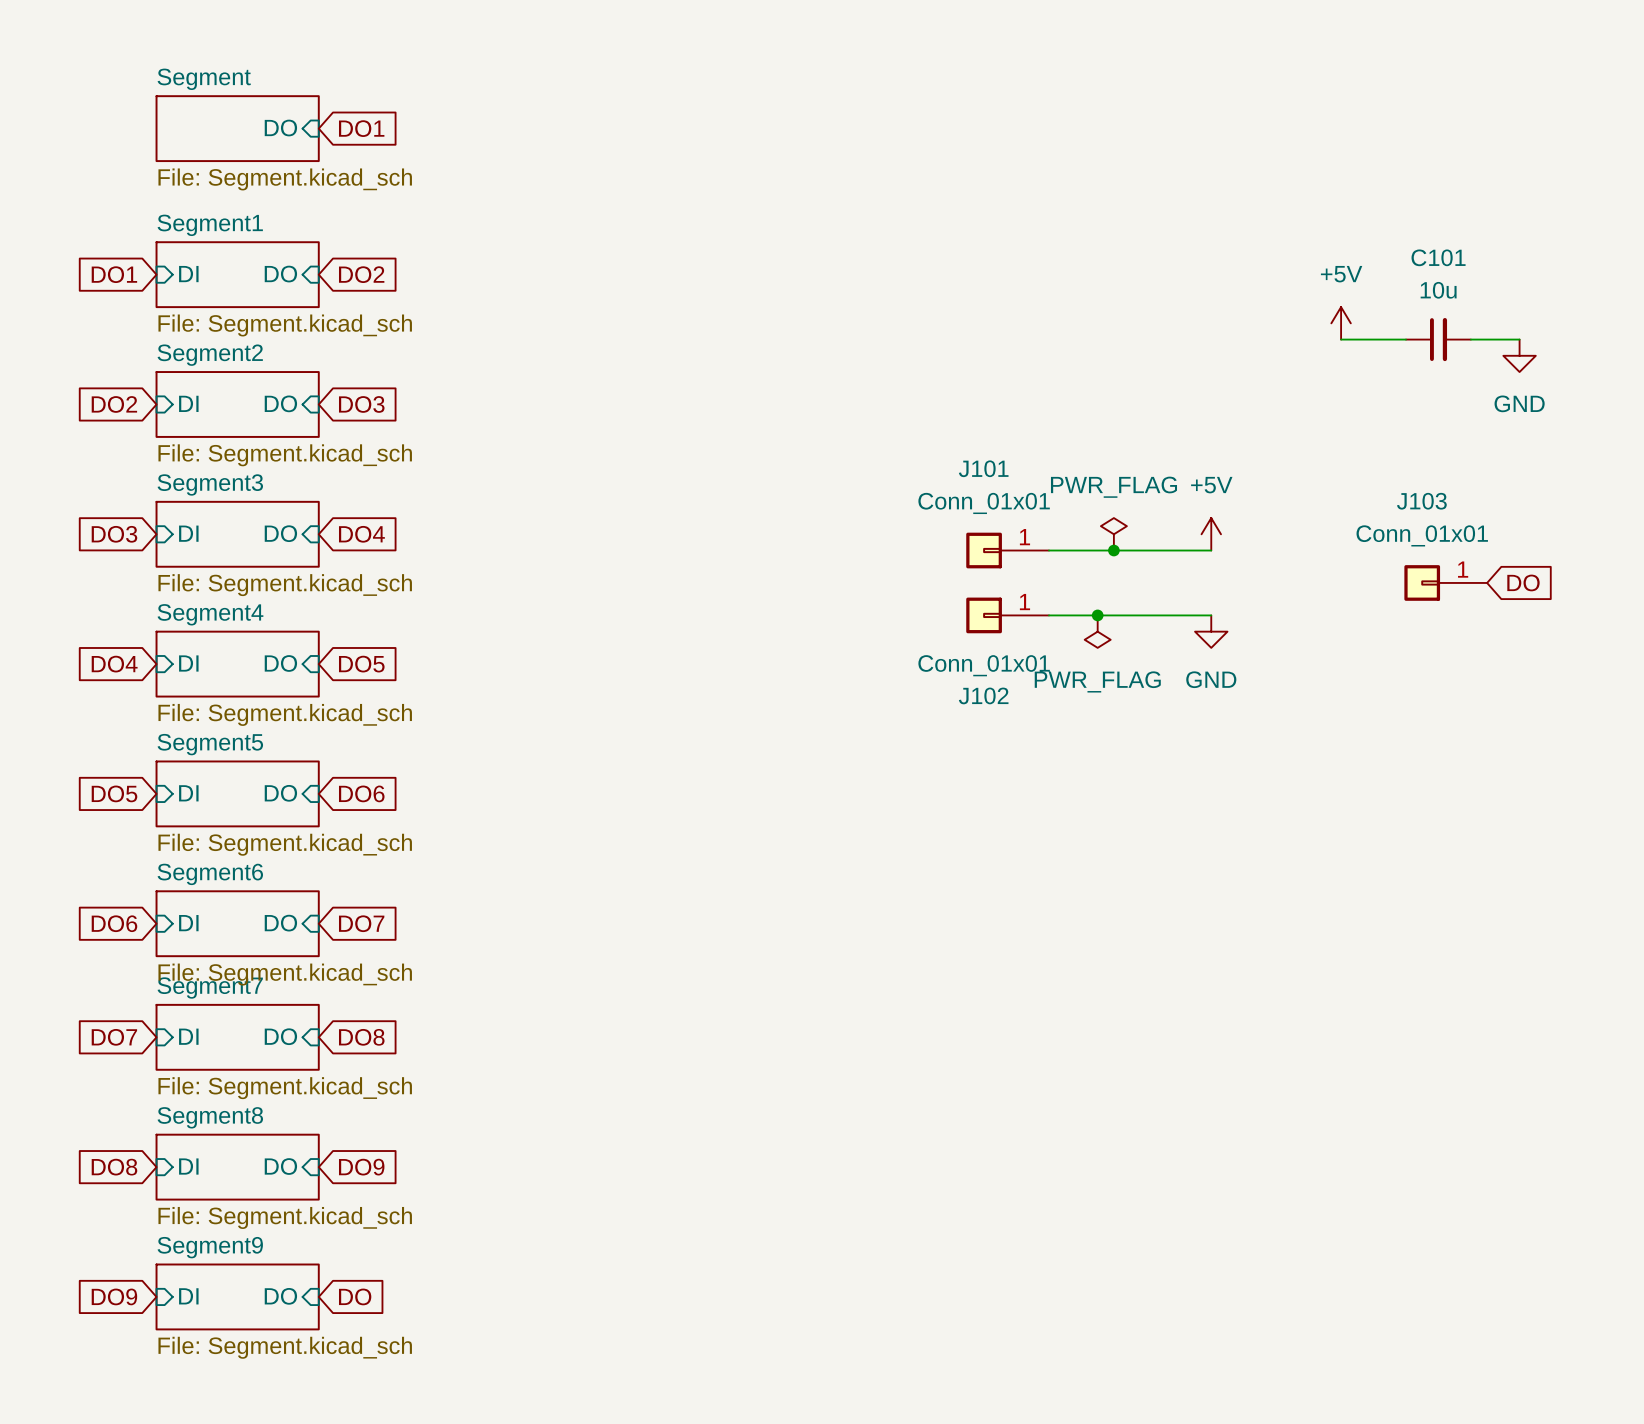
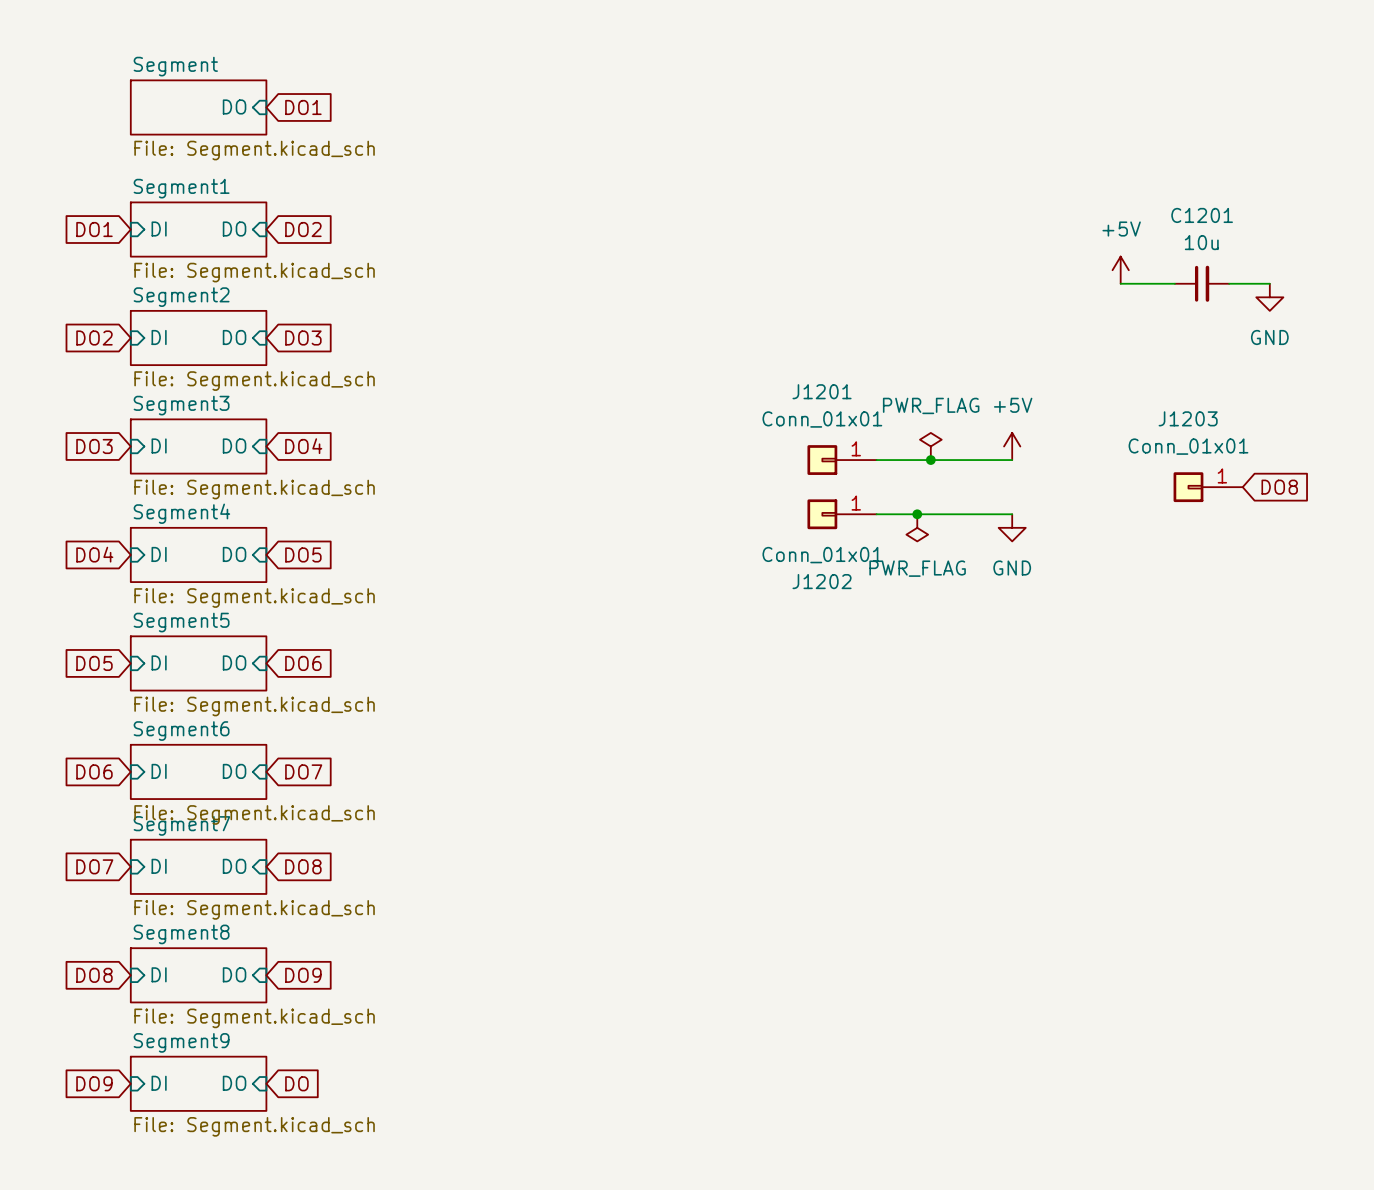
C101 name: C101 (1438, 257) -> C1201 (1202, 215)
J101 name: J101 (983, 468) -> J1201 (822, 391)
J103 name: J103 (1421, 501) -> J1203 (1188, 418)
global label: DO (1523, 582) -> DO8 (1279, 487)
J102 name: J102 (983, 695) -> J1202 (822, 581)

